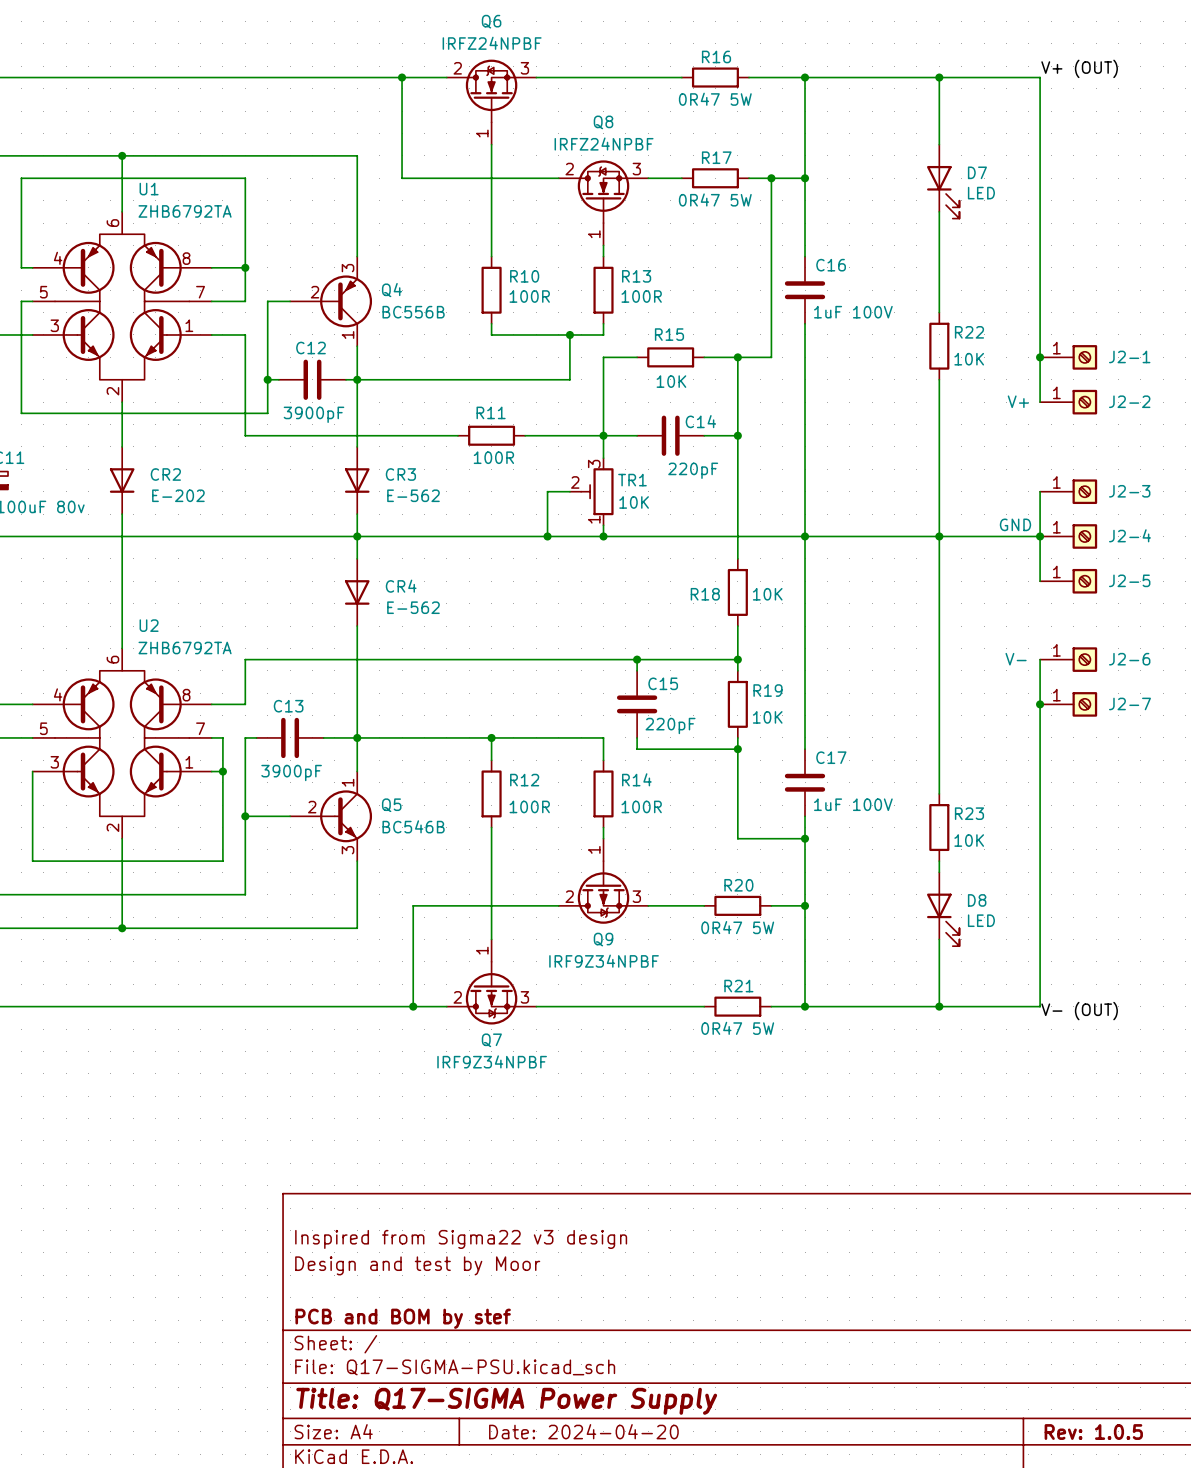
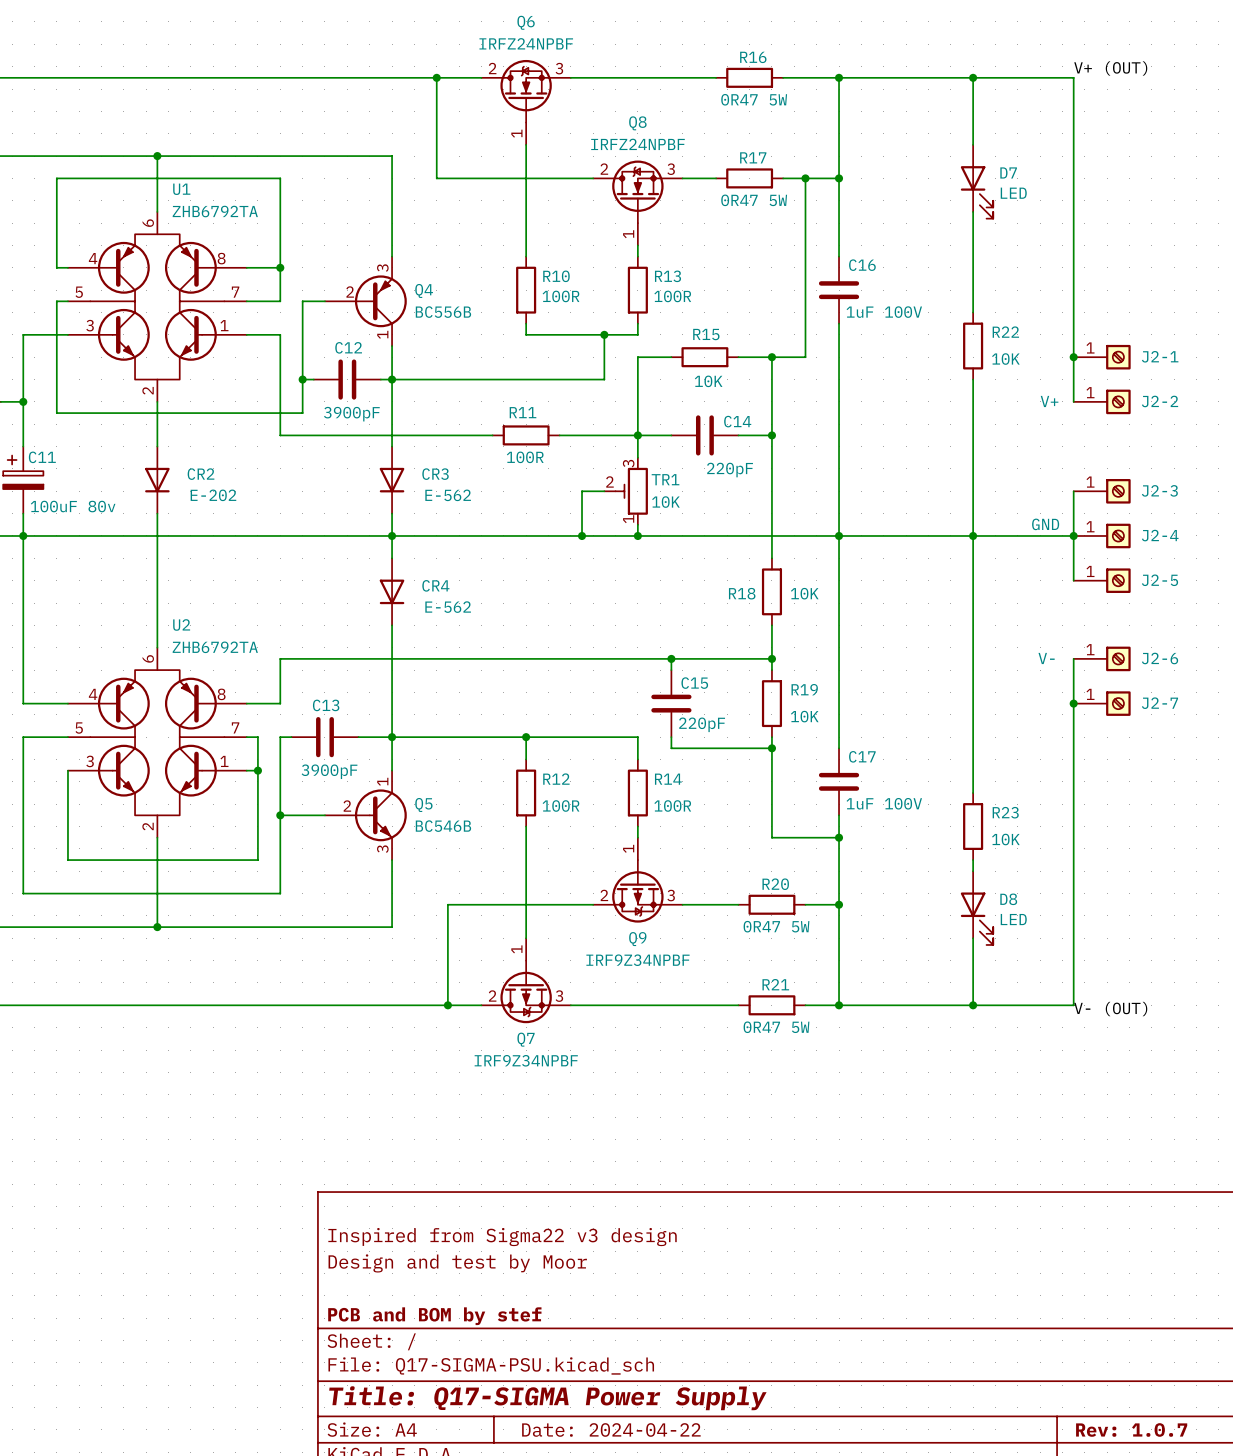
title block: Date: 2024-04-20 (583, 1431) -> Date: 2024-04-22 (611, 1429)
title block: Rev: 1.0.5 (1093, 1432) -> Rev: 1.0.7 (1131, 1429)

